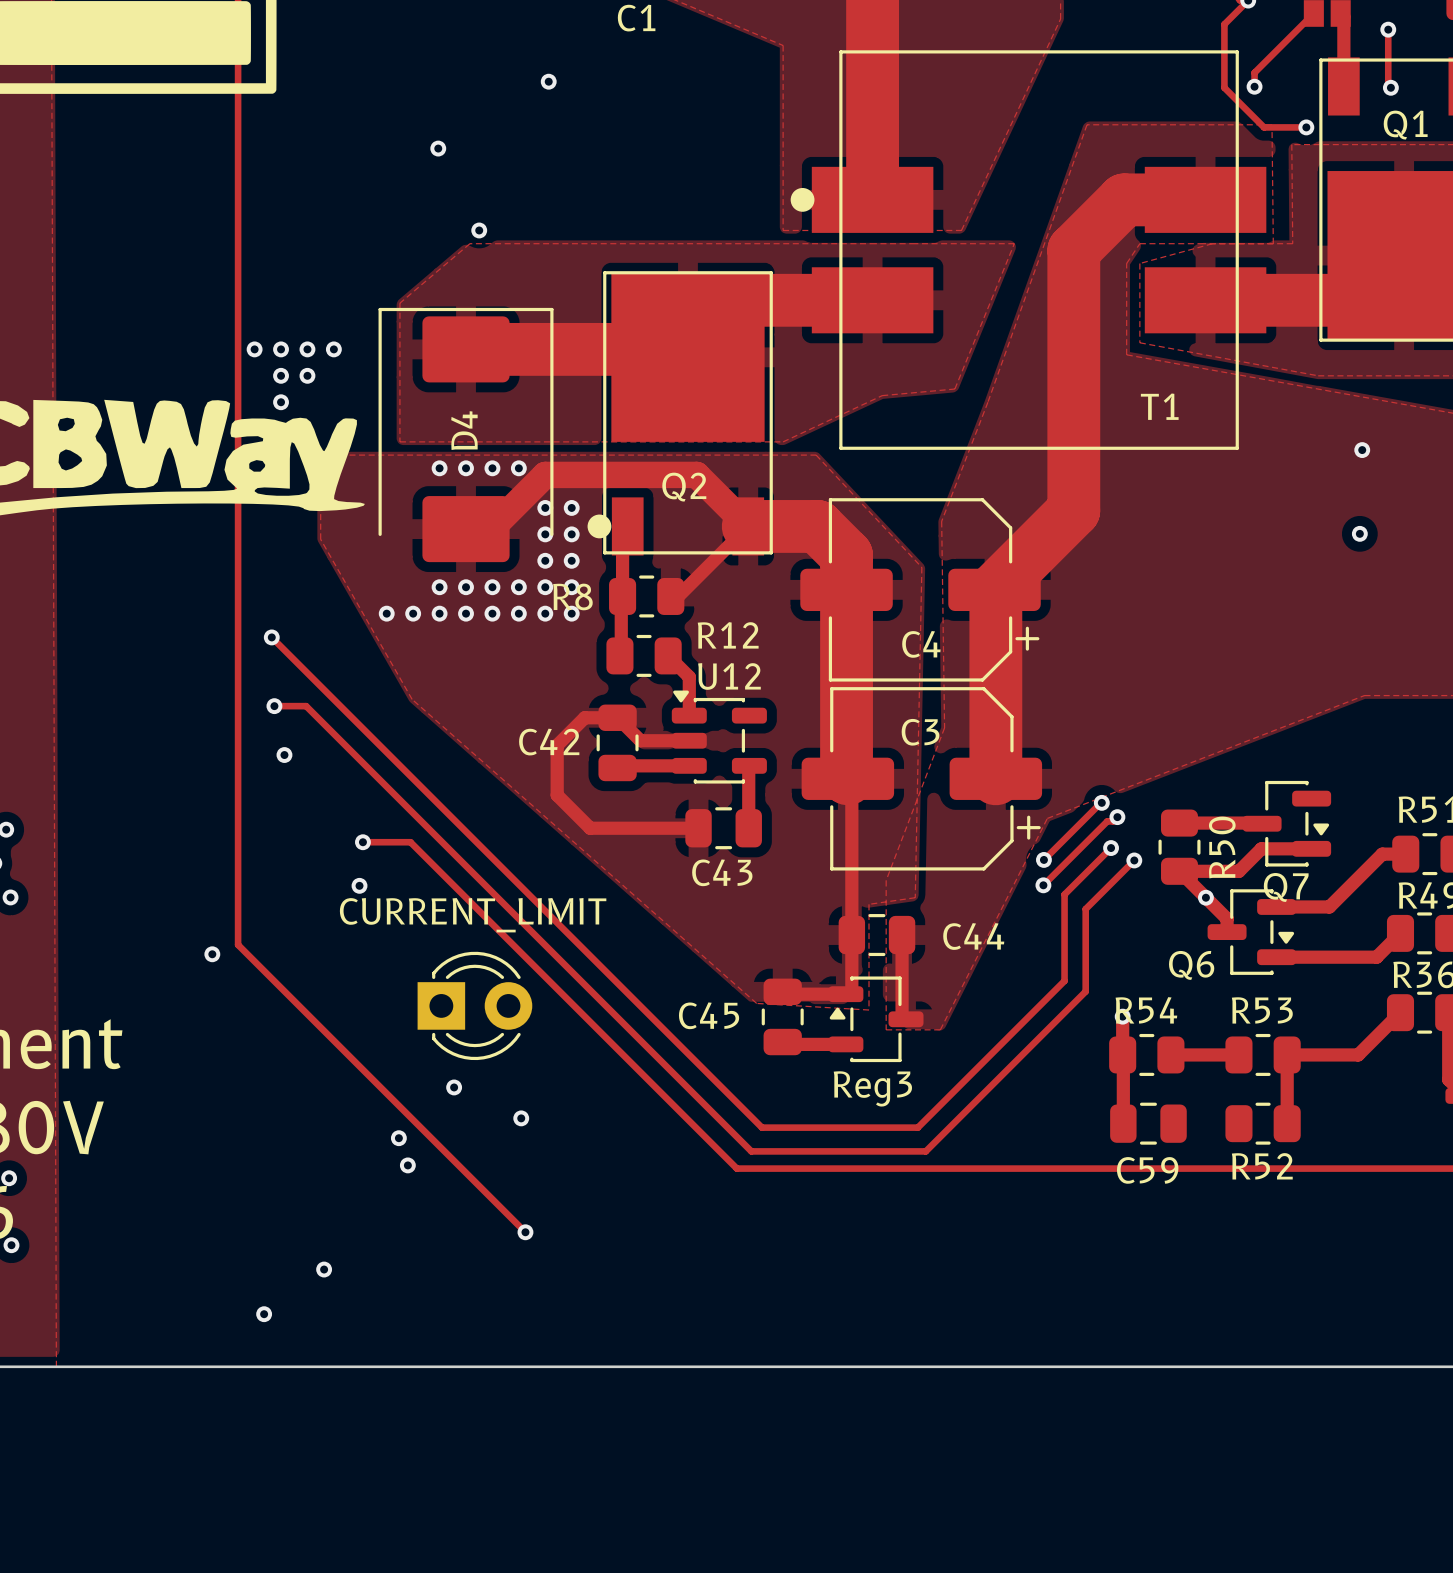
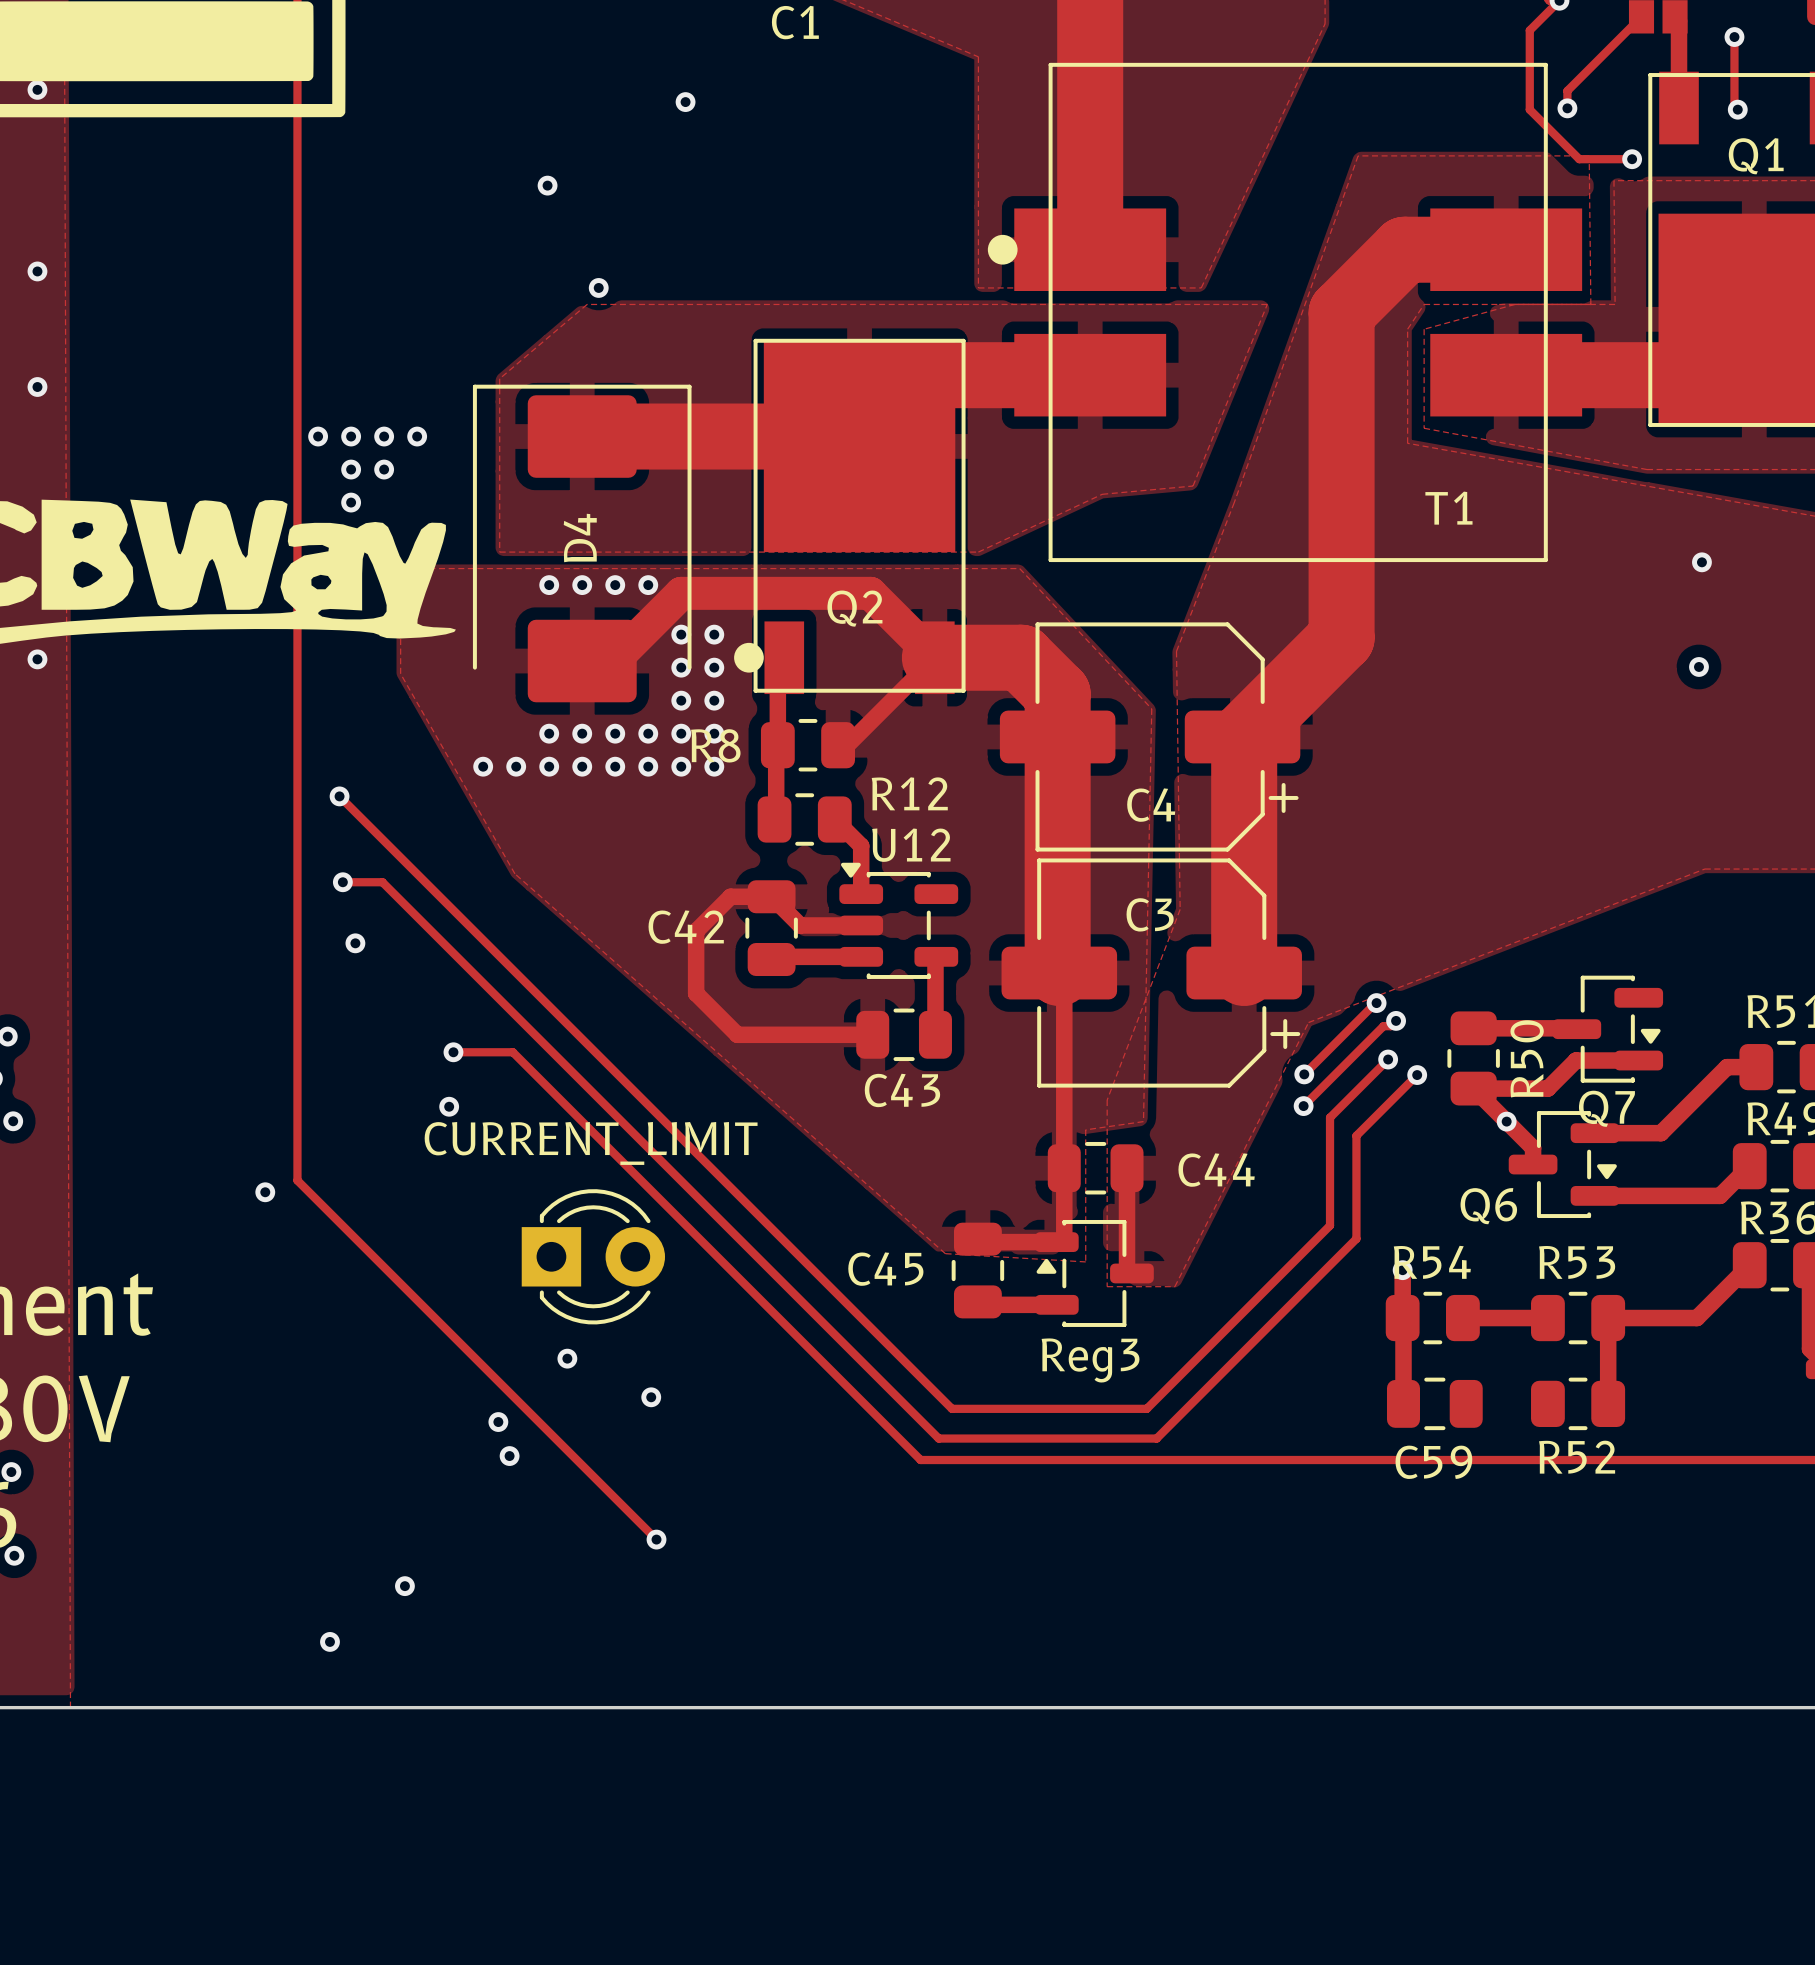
via: none -> (37, 89)
via: none -> (37, 271)
via: none -> (37, 387)
via: none -> (37, 659)

